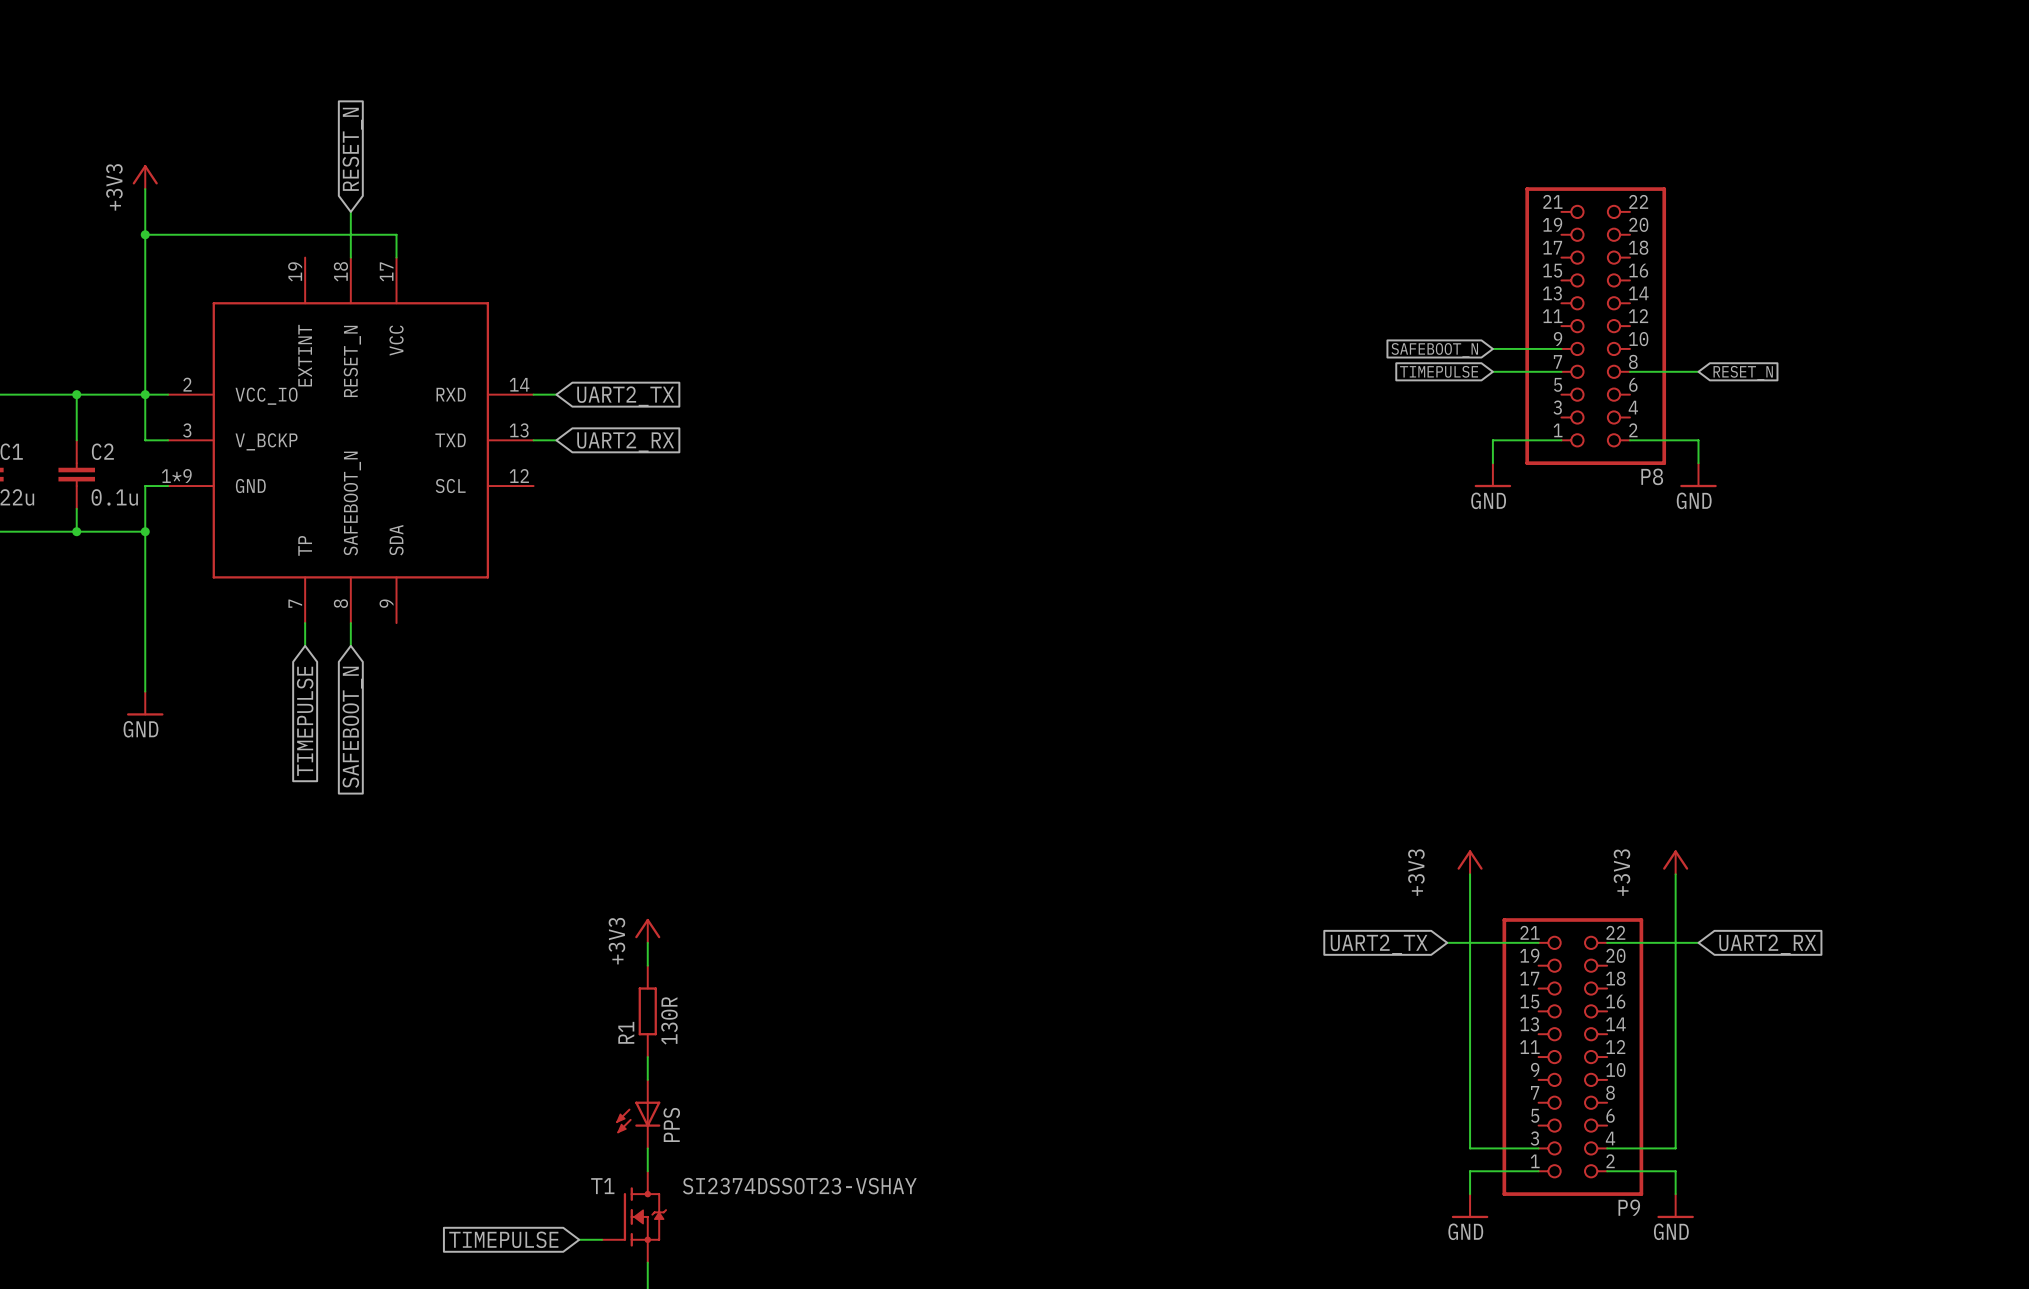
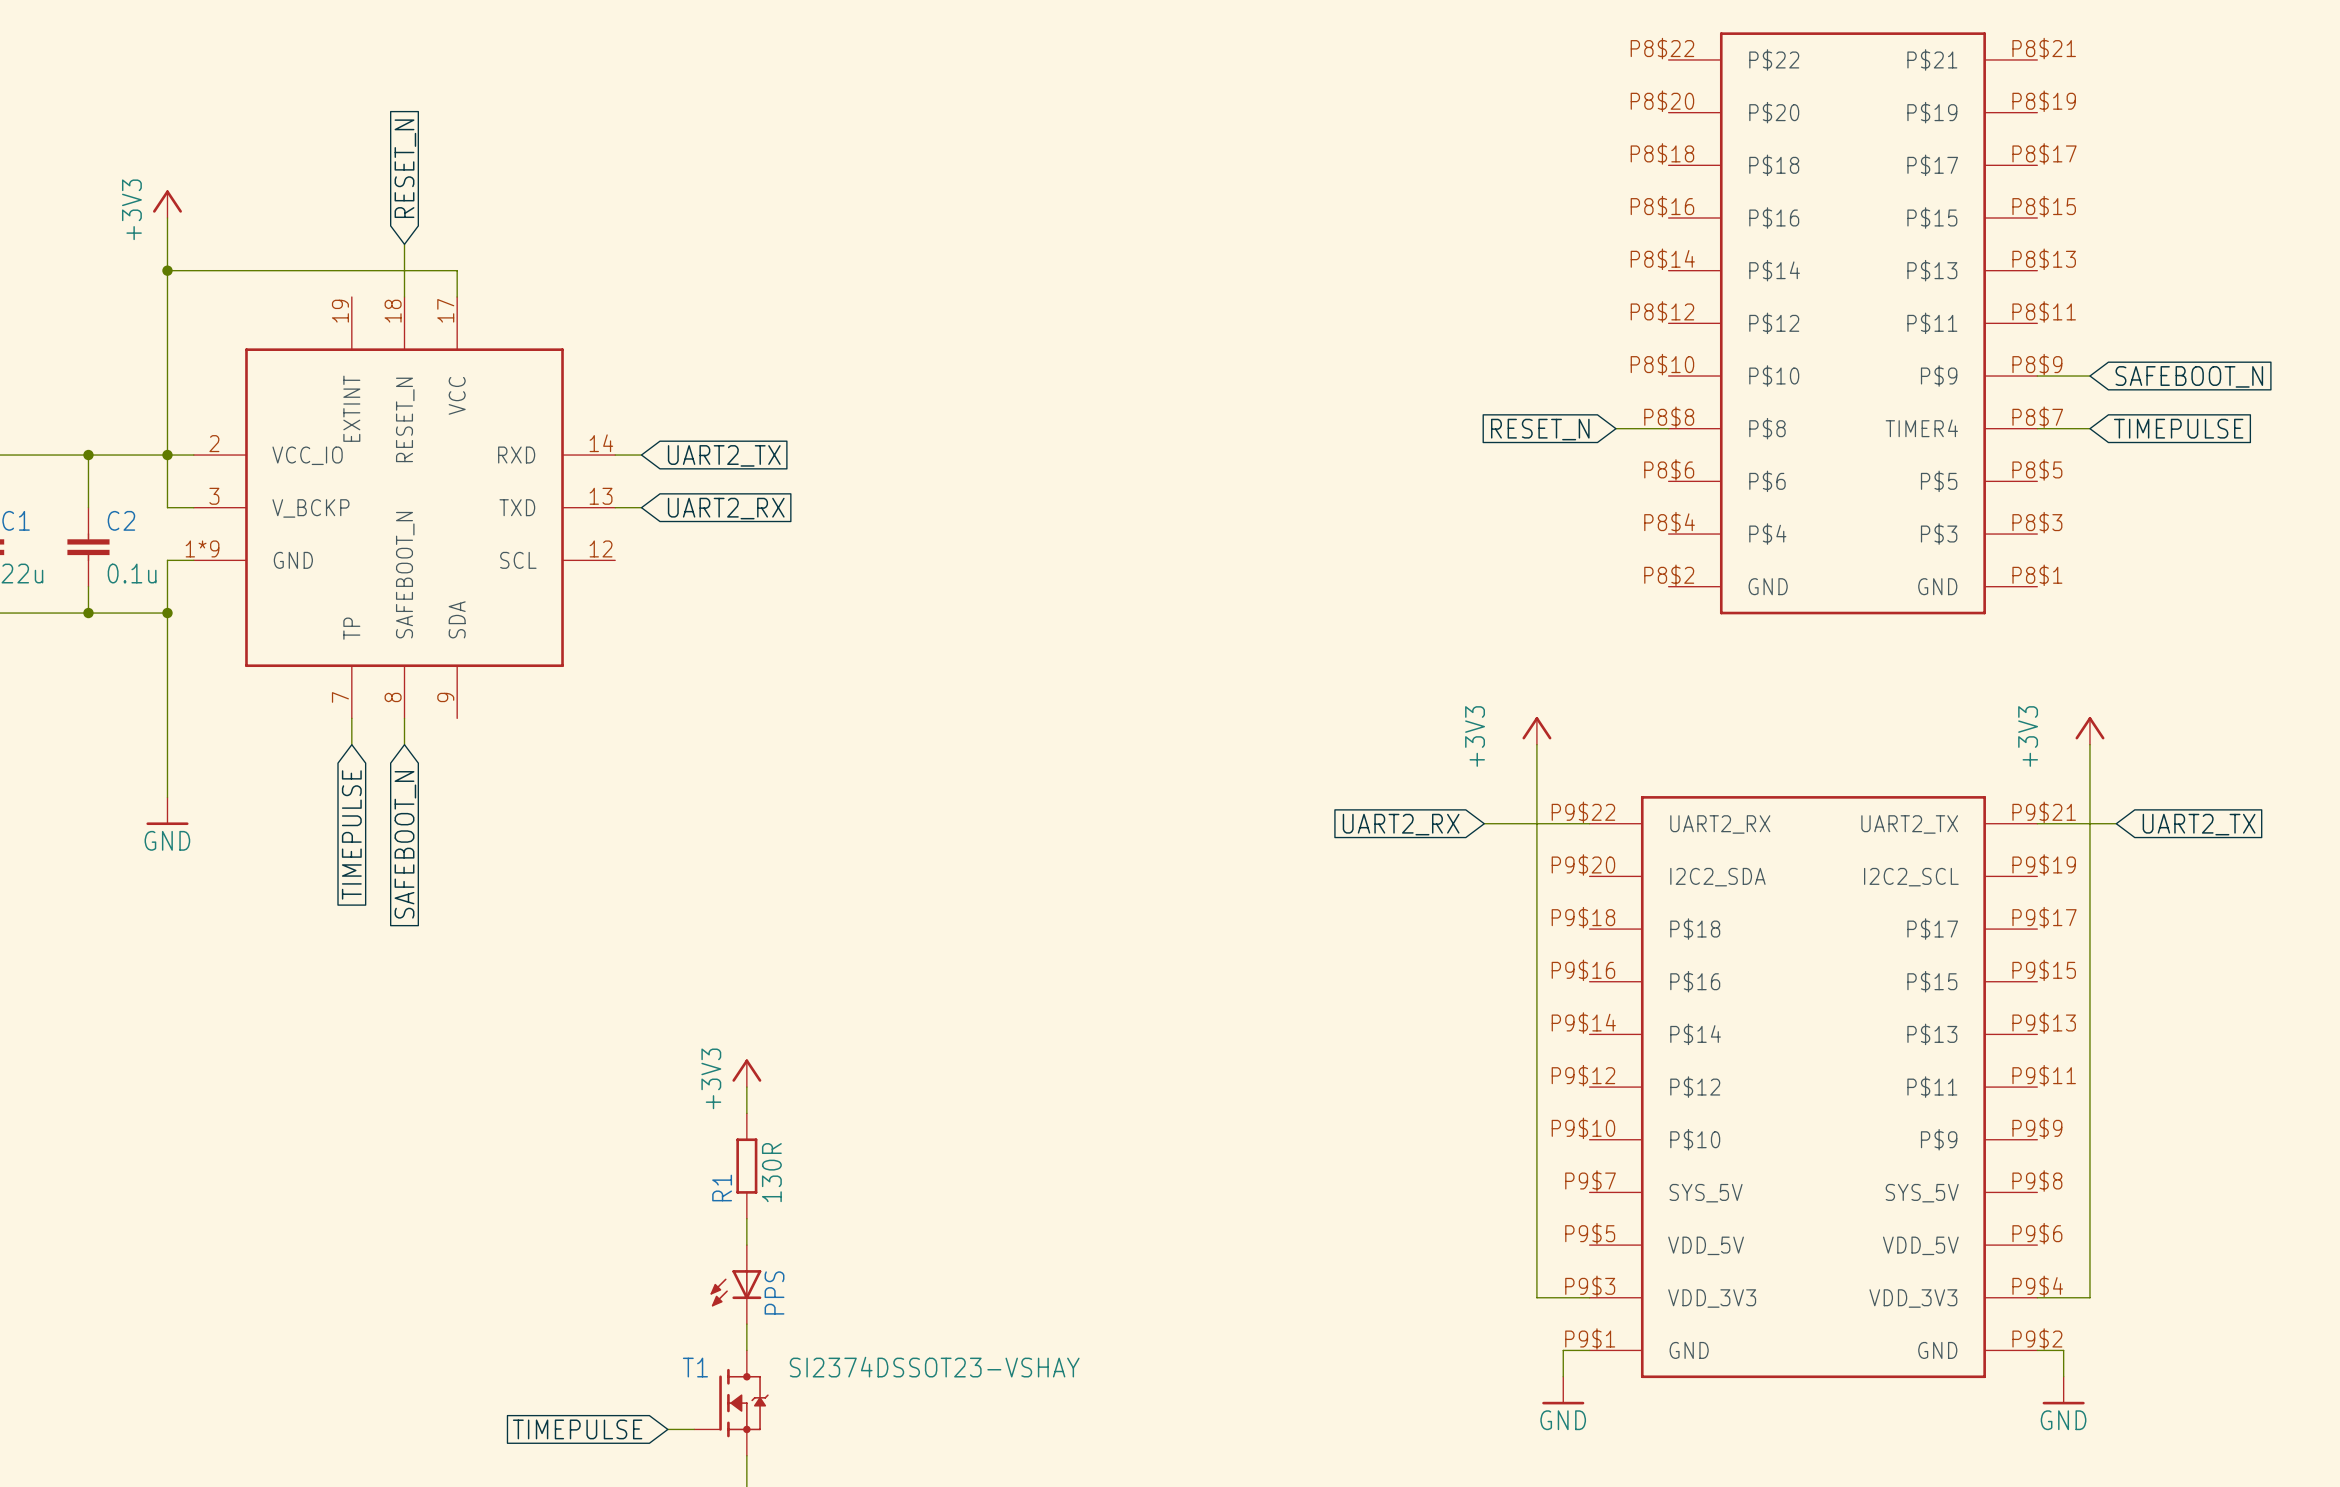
part: none -> (1852, 323)
P8: (1595, 326) -> none
wire: none -> (2037, 376) (2089, 376)
global label: none -> SAFEBOOT_N (2189, 376)
wire: (1492, 348) (1561, 348) -> none
global label: SAFEBOOT_N (1434, 350) -> none
wire: none -> (1615, 428) (1668, 428)
global label: TIMEPULSE (1439, 371) -> none
wire: (1492, 371) (1561, 371) -> none
wire: (1629, 371) (1698, 371) -> none
wire: none -> (2037, 428) (2089, 428)
global label: none -> TIMEPULSE (2178, 428)
global label: none -> RESET_N (1540, 429)
global label: RESET_N (1743, 373) -> none
wire: (1561, 440) (1492, 440) (1492, 463) -> none
wire: (1629, 440) (1698, 440) (1698, 463) -> none
power symbol: GND (1492, 475) -> none
power symbol: GND (1698, 475) -> none
power symbol: none -> +3V3 (1536, 730)
power symbol: none -> +3V3 (2089, 730)
wire: none -> (1536, 744) (1536, 1297) (1589, 1297)
wire: none -> (2089, 744) (2089, 1297) (2037, 1297)
wire: none -> (1484, 823) (1589, 823)
wire: none -> (2037, 823) (2116, 823)
global label: none -> UART2_RX (1401, 824)
global label: none -> UART2_TX (2199, 824)
power symbol: +3V3 (1470, 862) -> none
power symbol: +3V3 (1675, 862) -> none
wire: (1470, 874) (1470, 1148) (1538, 1148) -> none
wire: (1675, 874) (1675, 1148) (1607, 1148) -> none
wire: (1447, 942) (1538, 942) -> none
part: none -> (1813, 1087)
wire: (1607, 942) (1698, 942) -> none
global label: UART2_TX (1379, 944) -> none
global label: UART2_RX (1767, 944) -> none
P9: (1572, 1057) -> none
wire: none -> (1589, 1350) (1563, 1350) (1563, 1376)
wire: (1538, 1171) (1470, 1171) (1470, 1194) -> none
wire: (1607, 1171) (1675, 1171) (1675, 1194) -> none
wire: none -> (2037, 1350) (2063, 1350) (2063, 1376)
power symbol position: GND (1470, 1206) -> GND (1563, 1390)
power symbol position: GND (1675, 1206) -> GND (2063, 1390)

